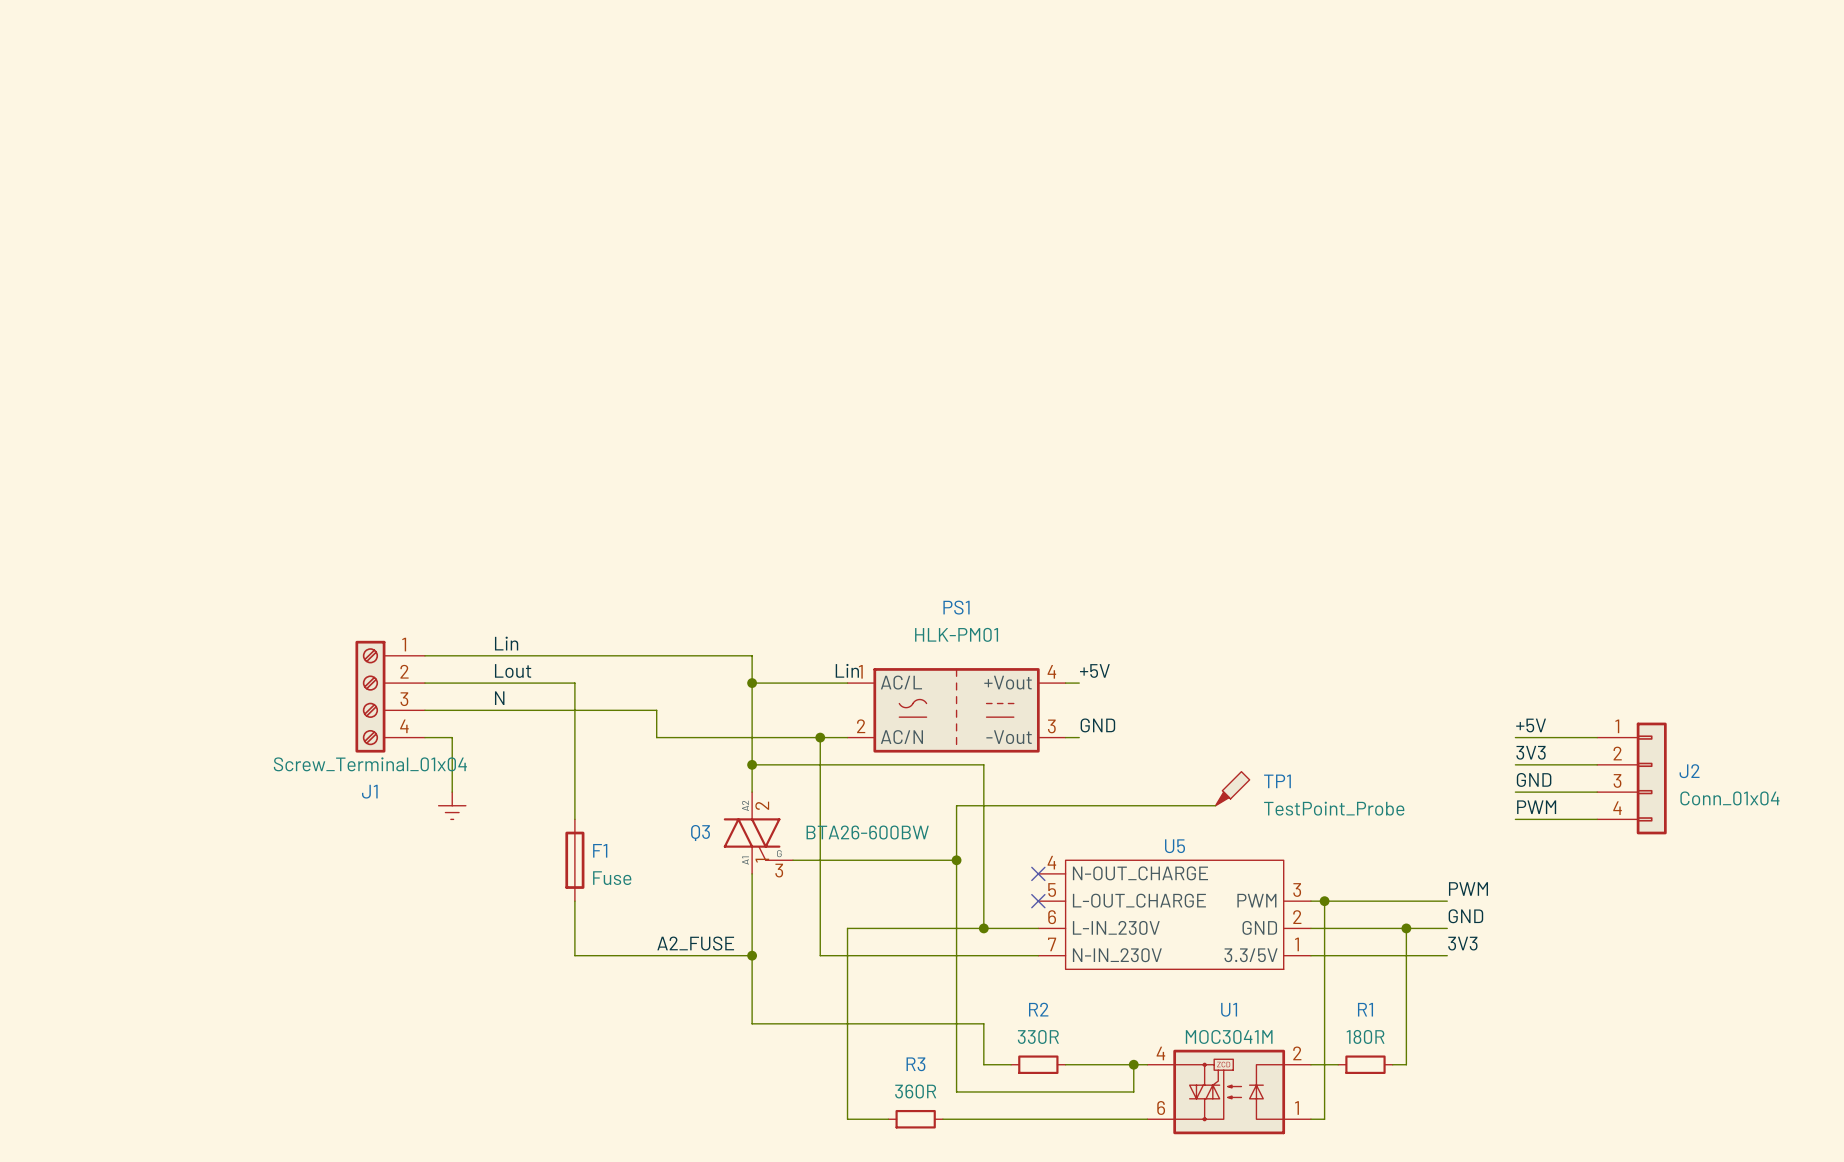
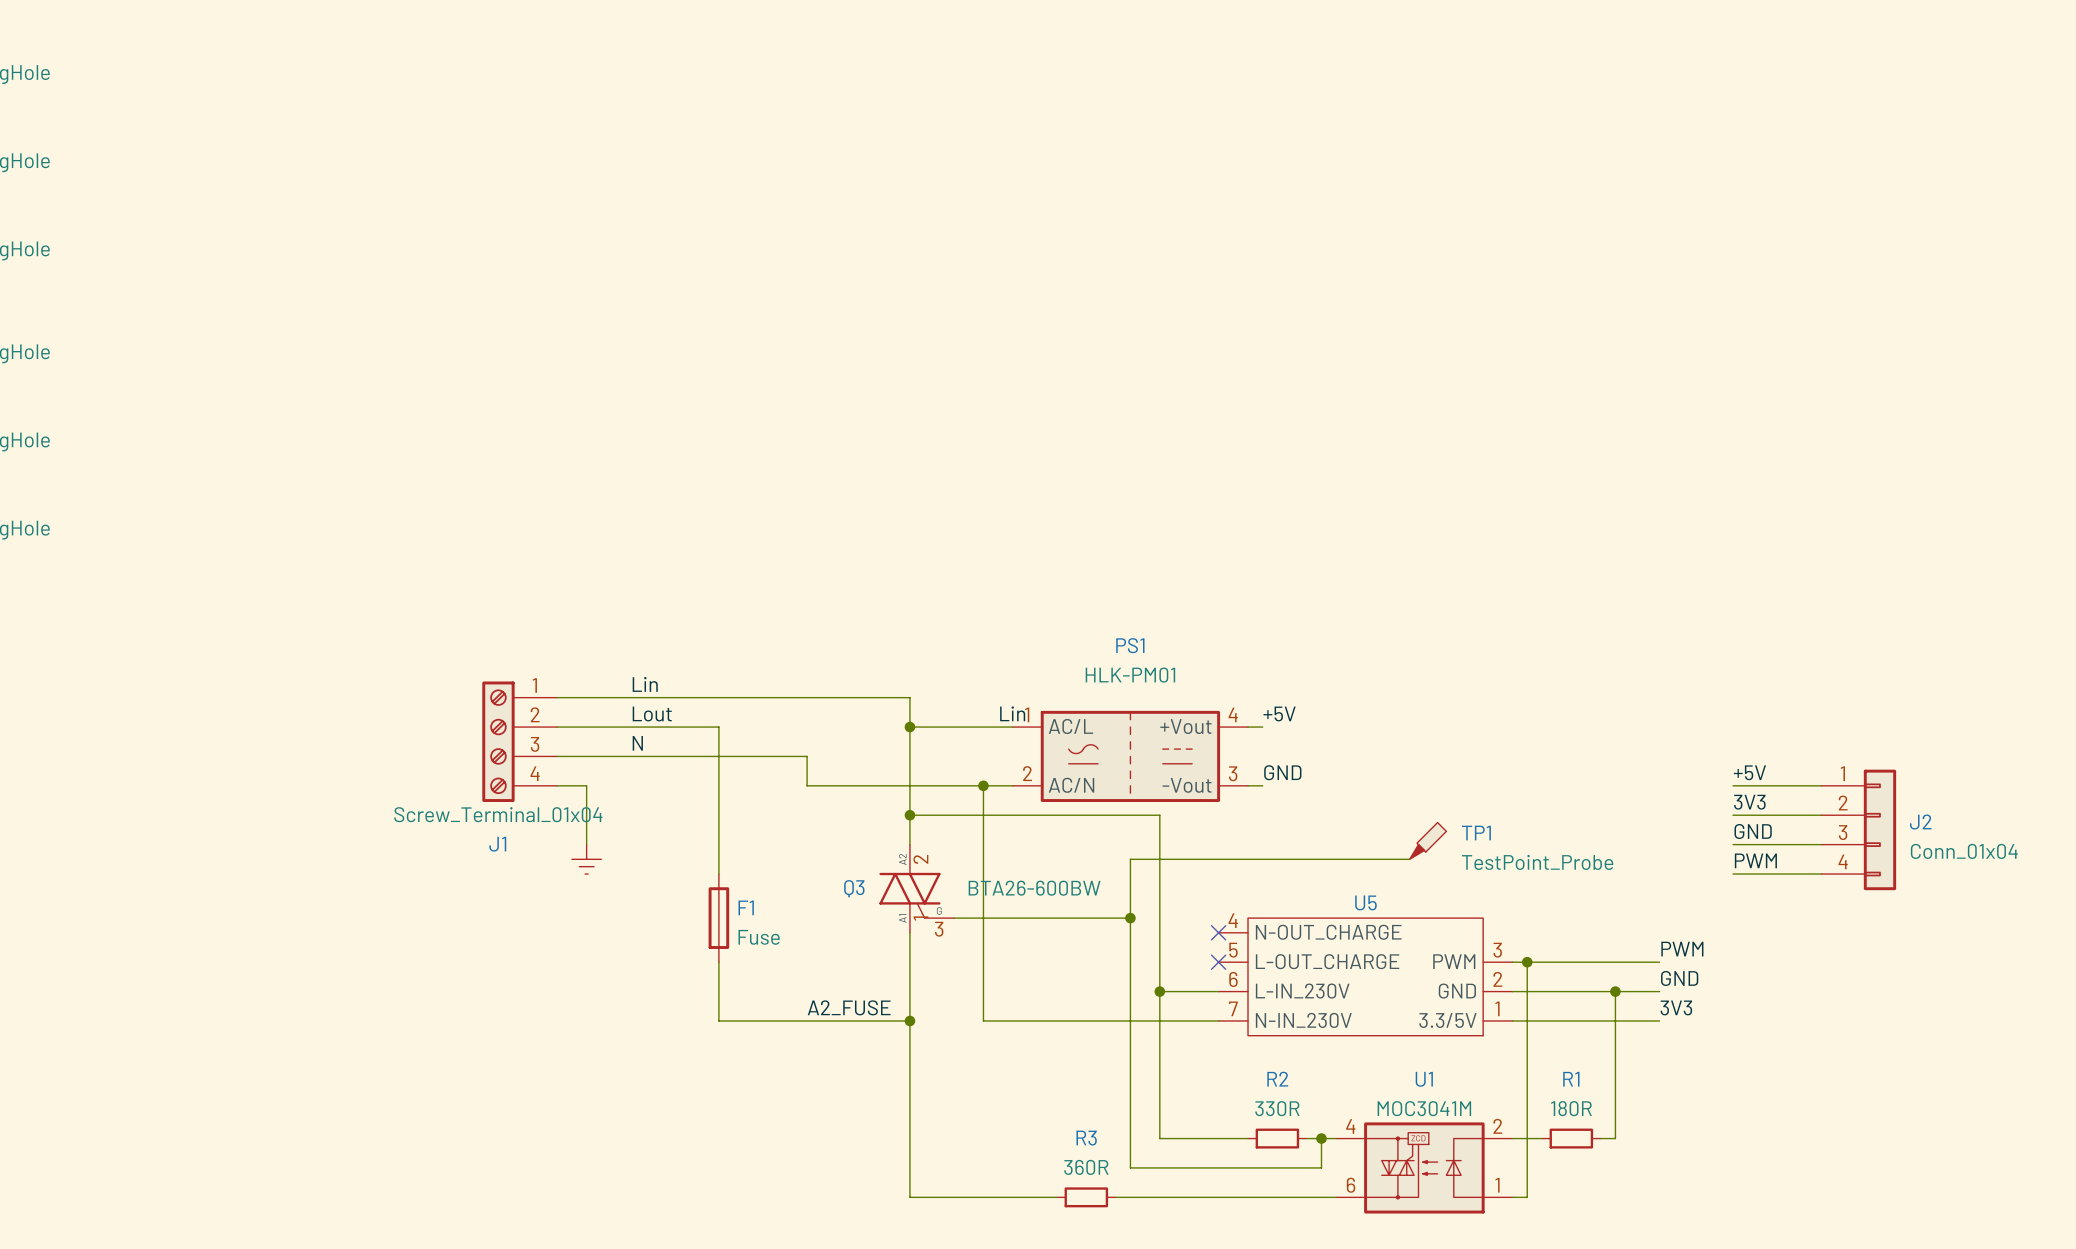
wire: (983, 928) (847, 928) (847, 1119) -> (1159, 991) (1159, 1094)
wire: (752, 1023) (983, 1023) -> (909, 1094) (909, 1197) (1012, 1197)
R2 position: (1038, 1064) -> (1277, 1138)
wire: (1065, 1064) (1120, 1064) -> (1248, 1138) (1189, 1138)

